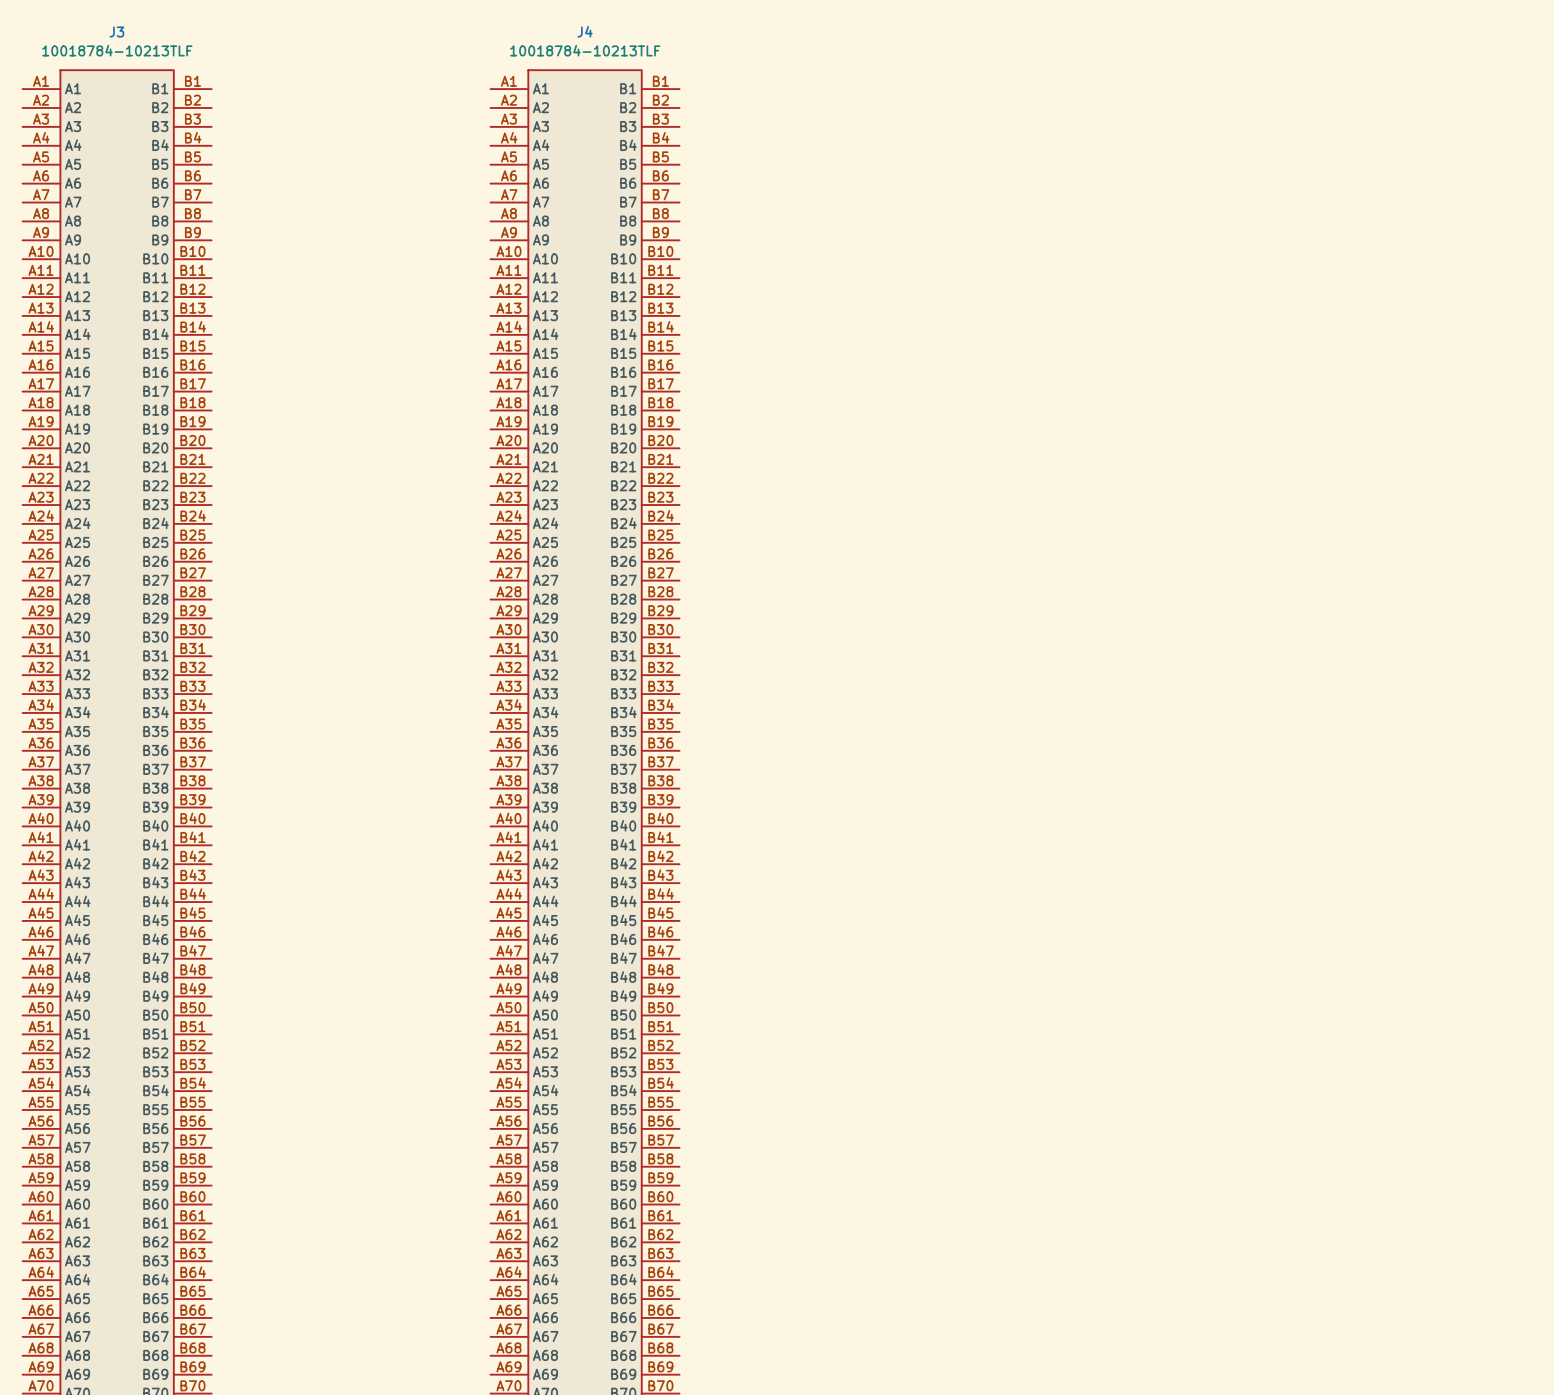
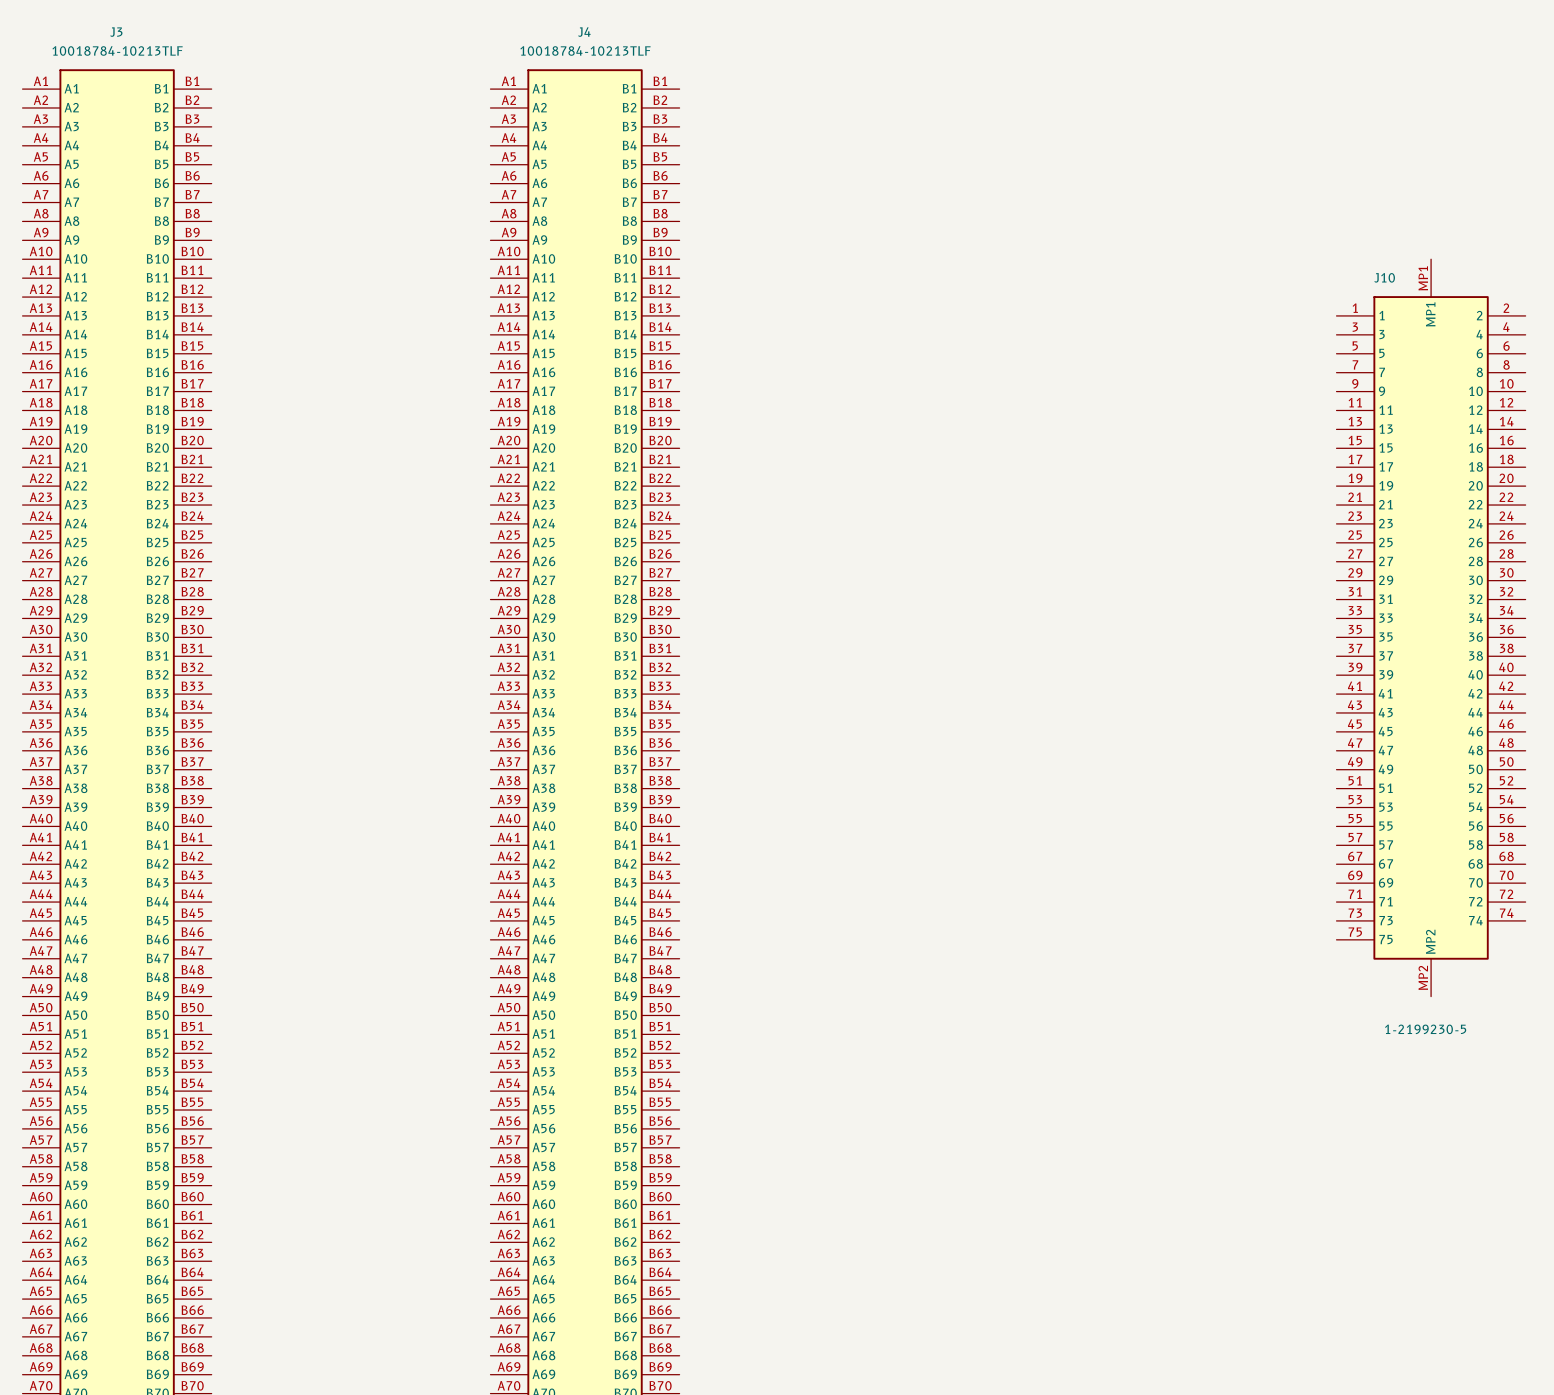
J10: none -> 1-2199230-5 (1431, 627)

